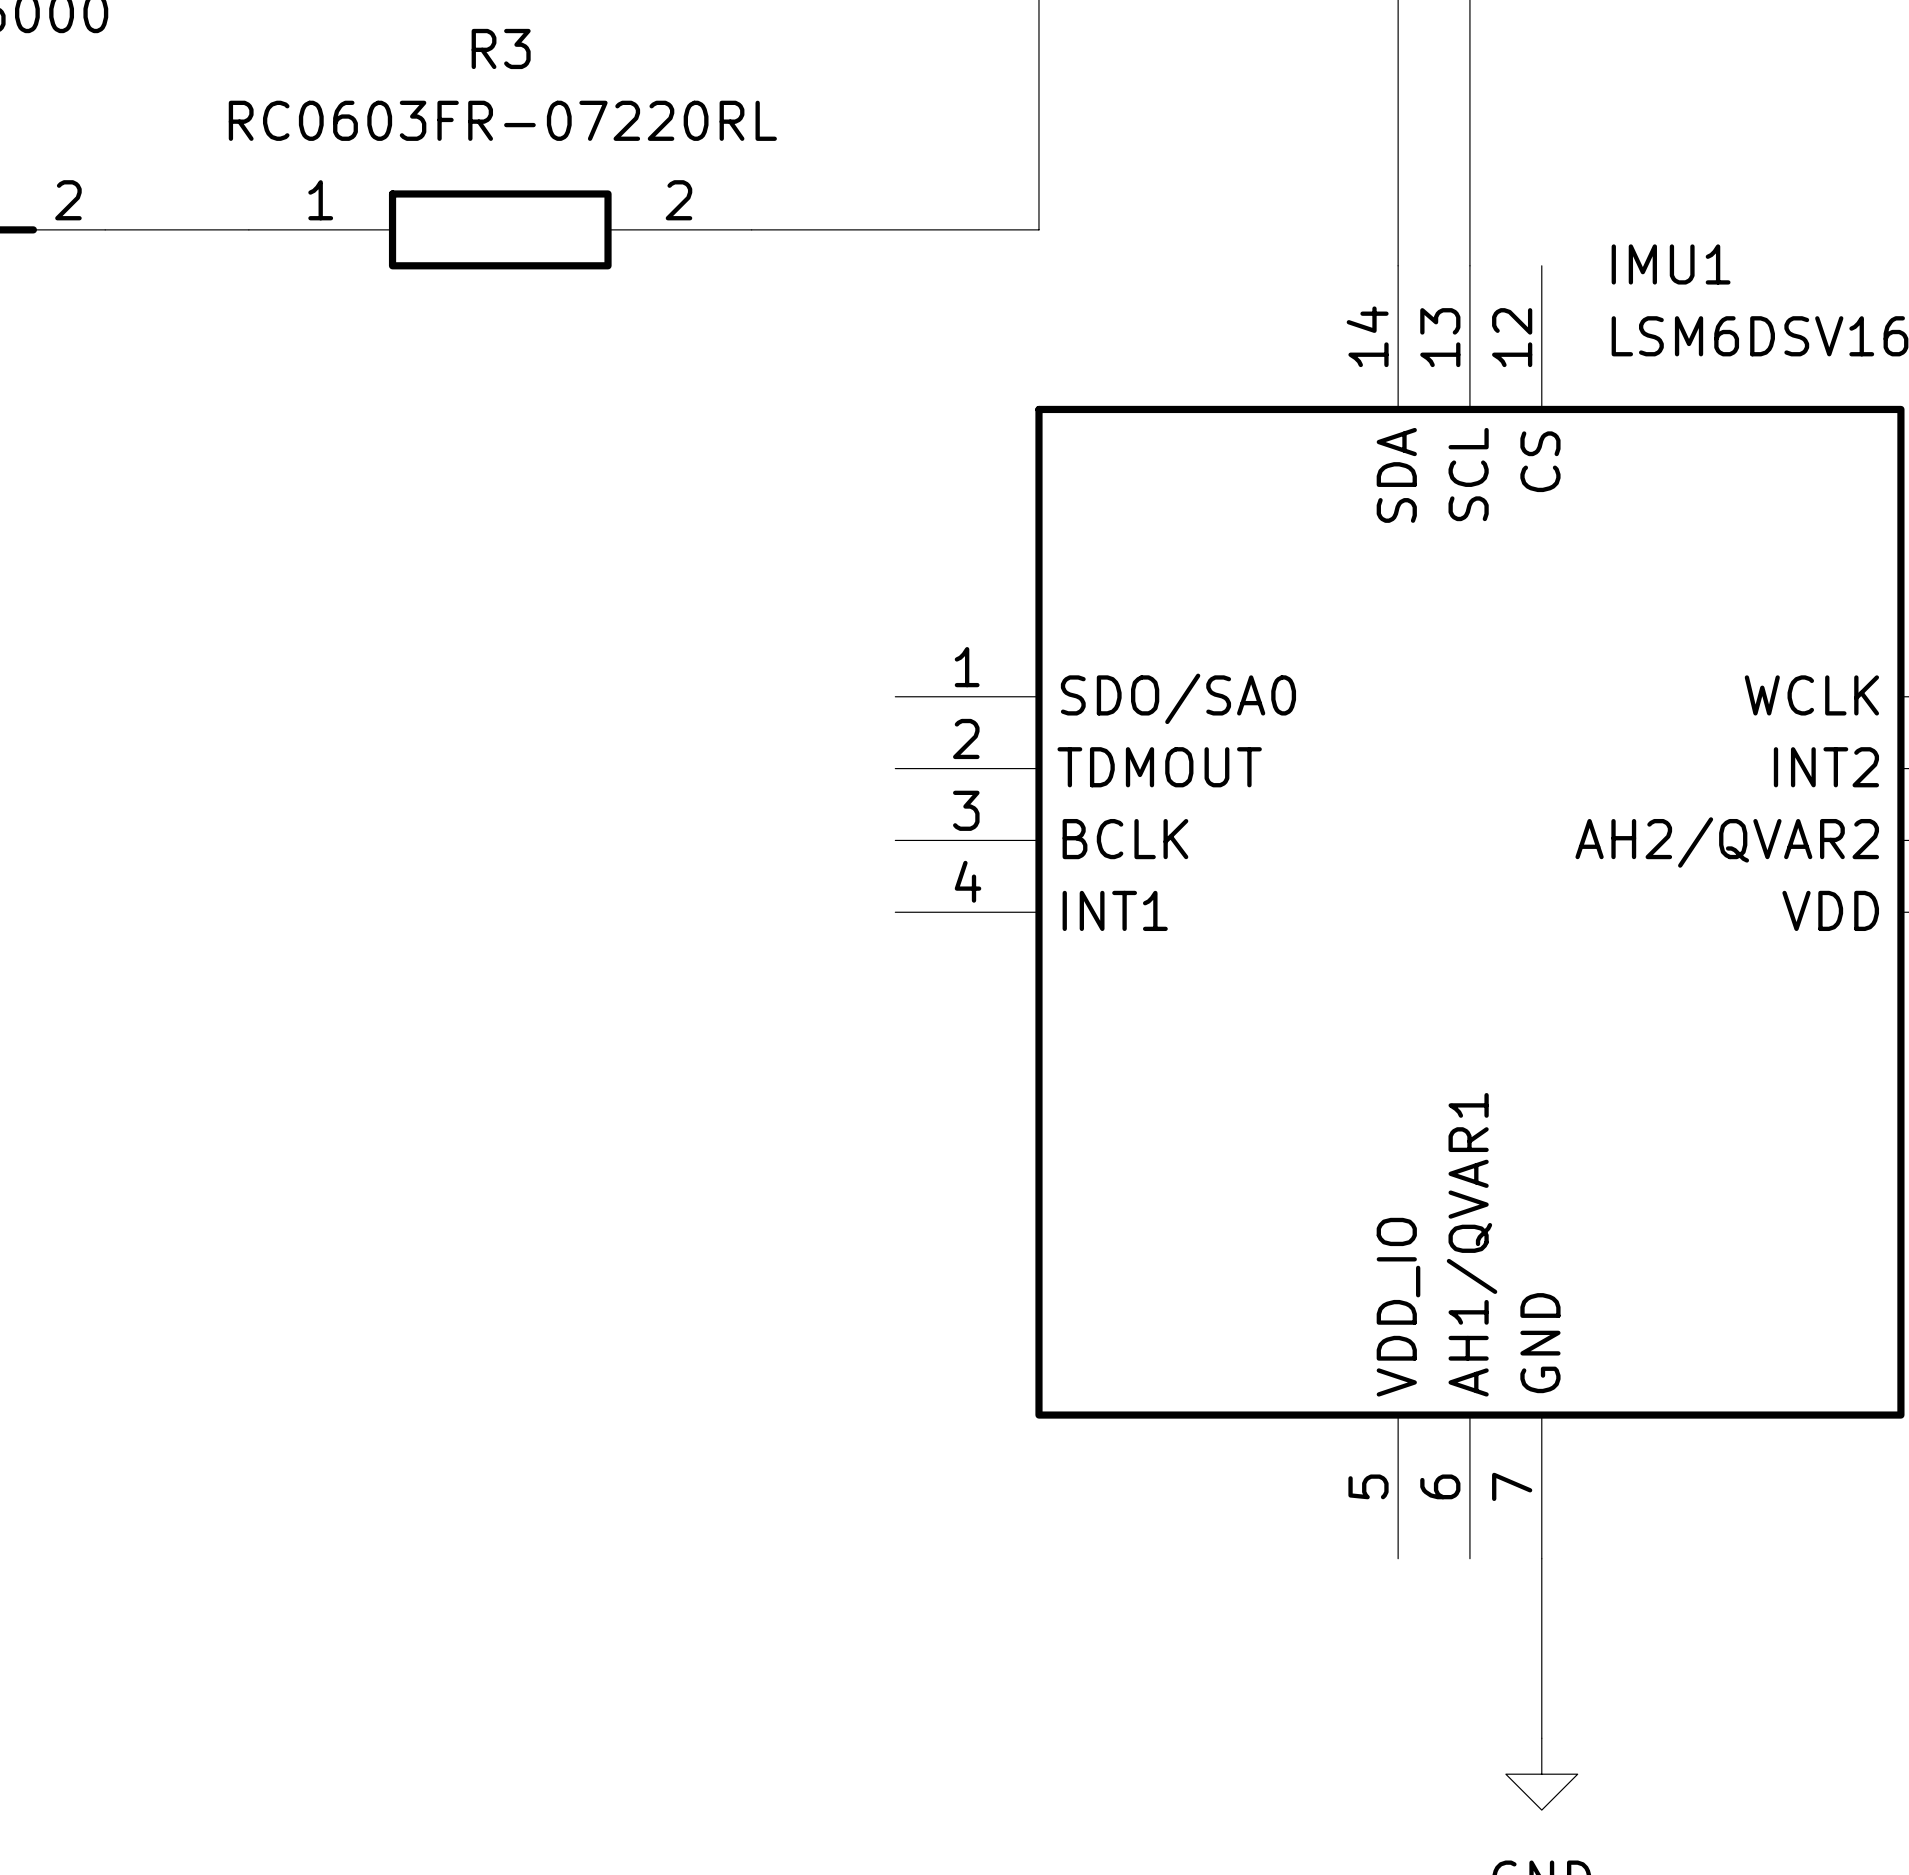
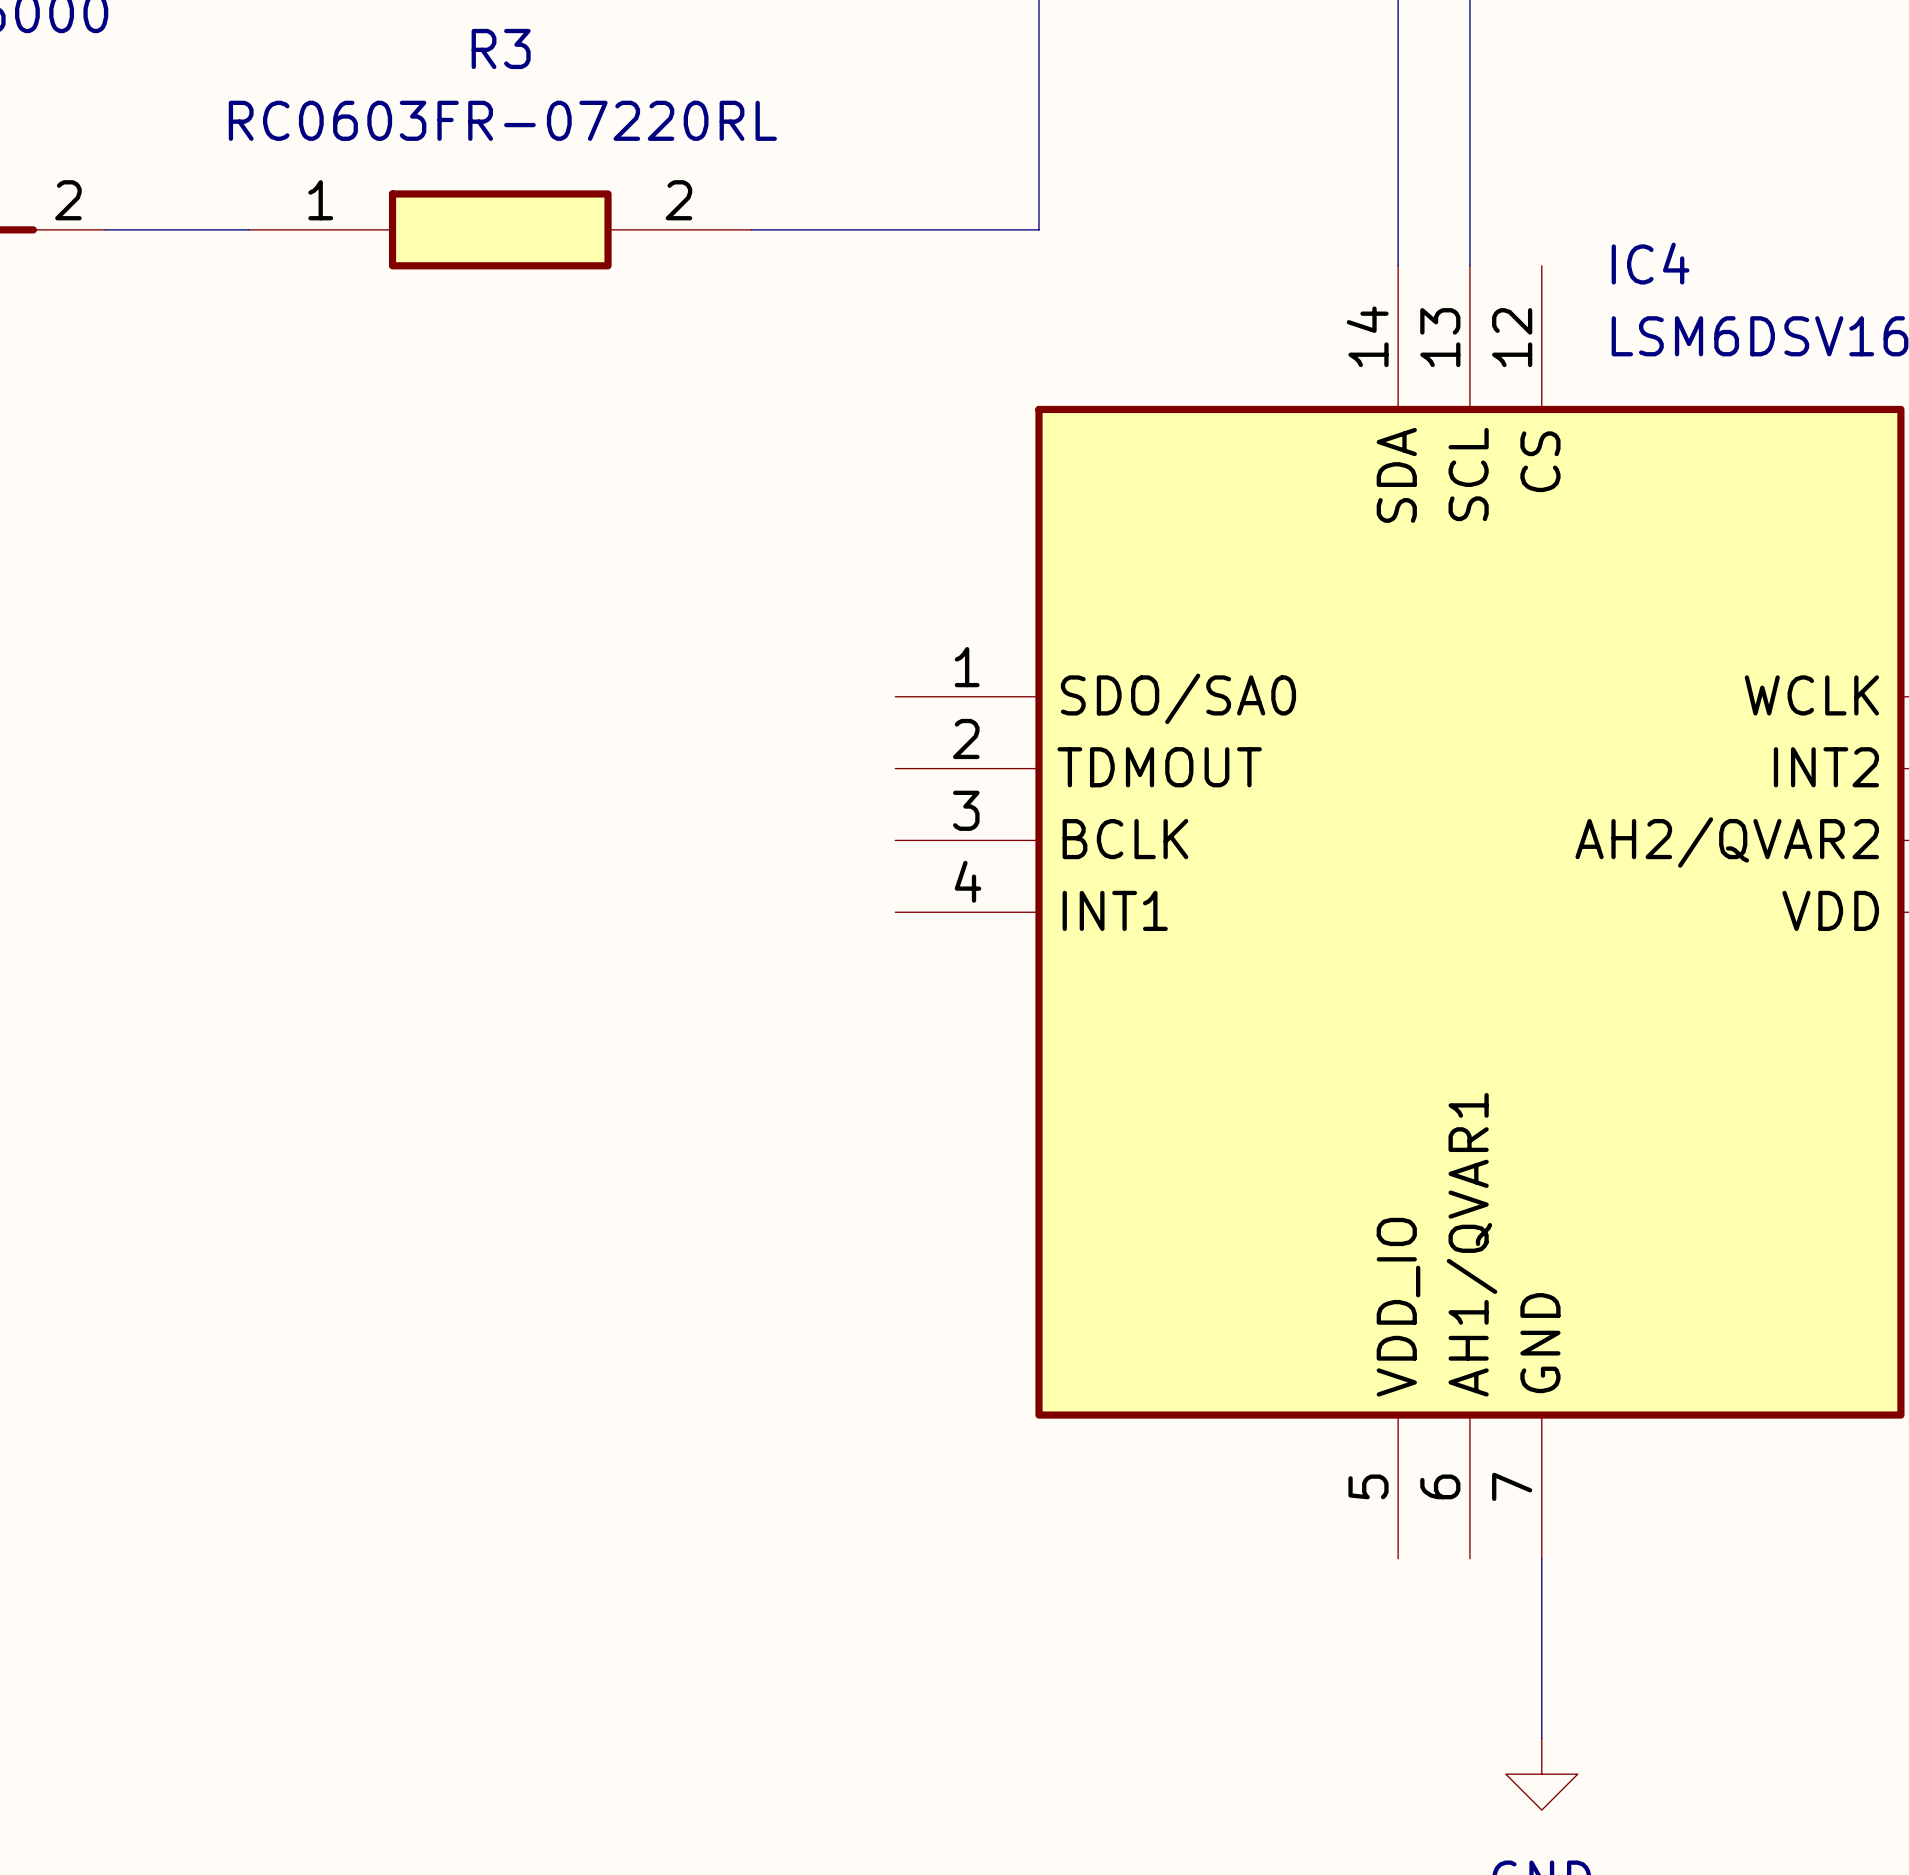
IMU1 name: IMU1 (1671, 264) -> IC4 (1650, 263)

